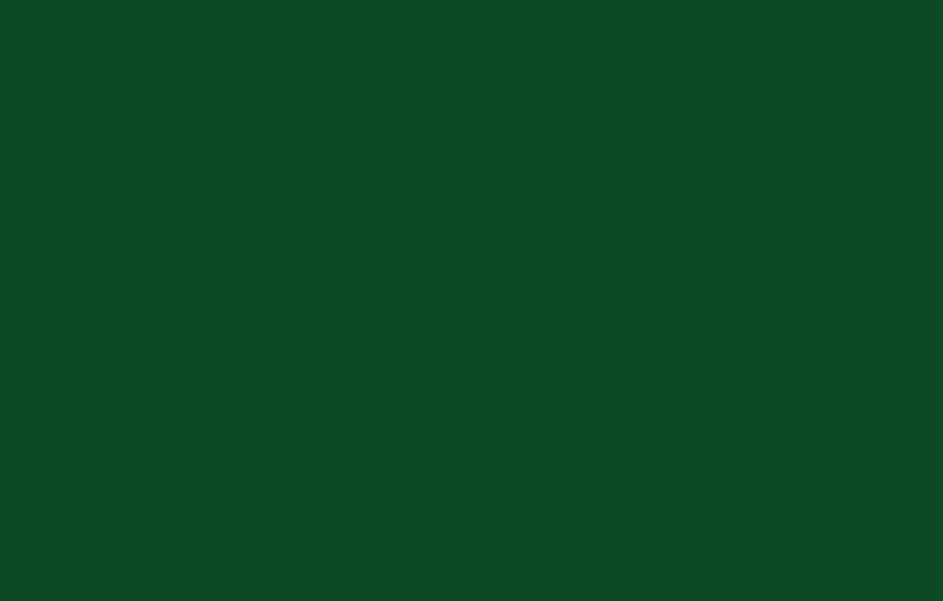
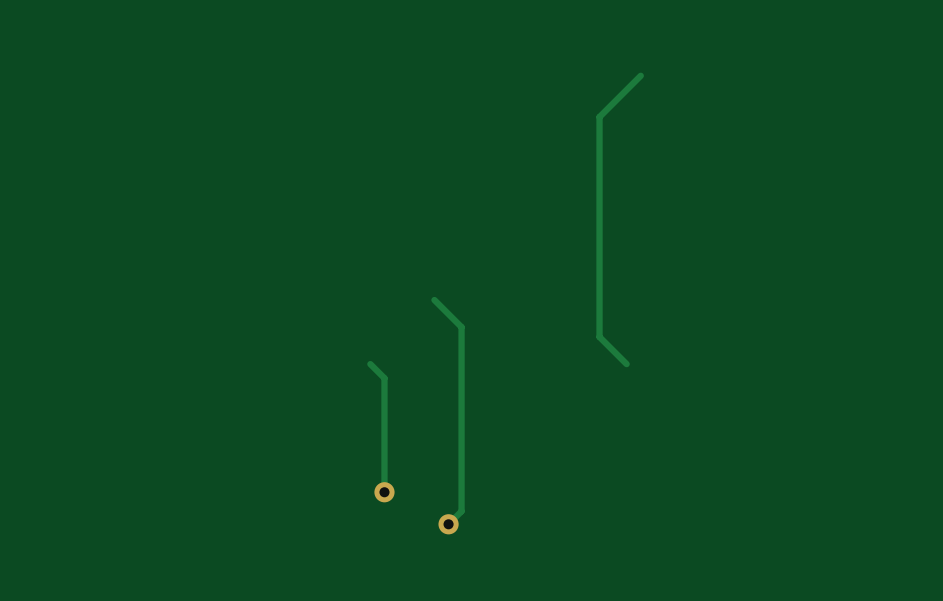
track: none -> (640, 75) (599, 117) (599, 336) (626, 364)
track: none -> (434, 300) (461, 327) (461, 511) (448, 524)
track: none -> (370, 364) (384, 378) (384, 492)
via: none -> (384, 492)
via: none -> (448, 524)

